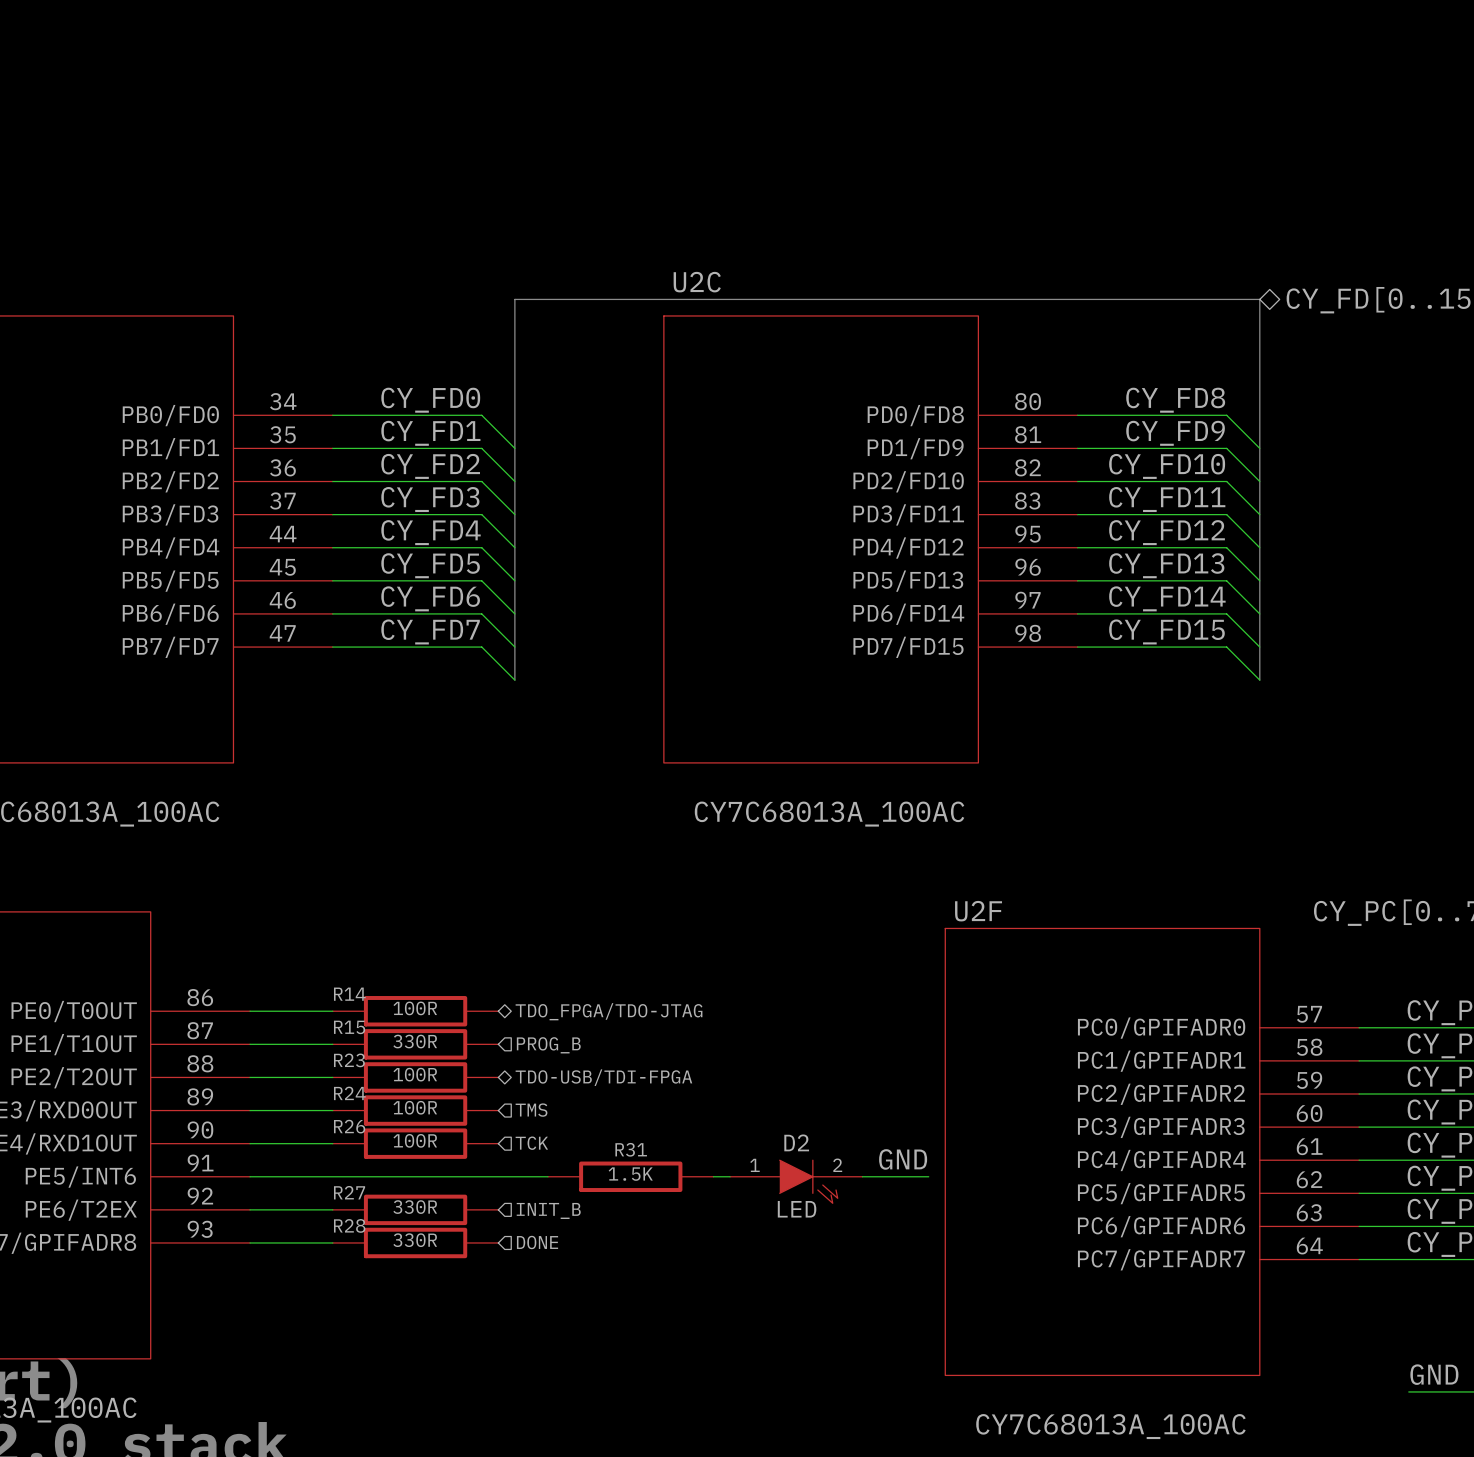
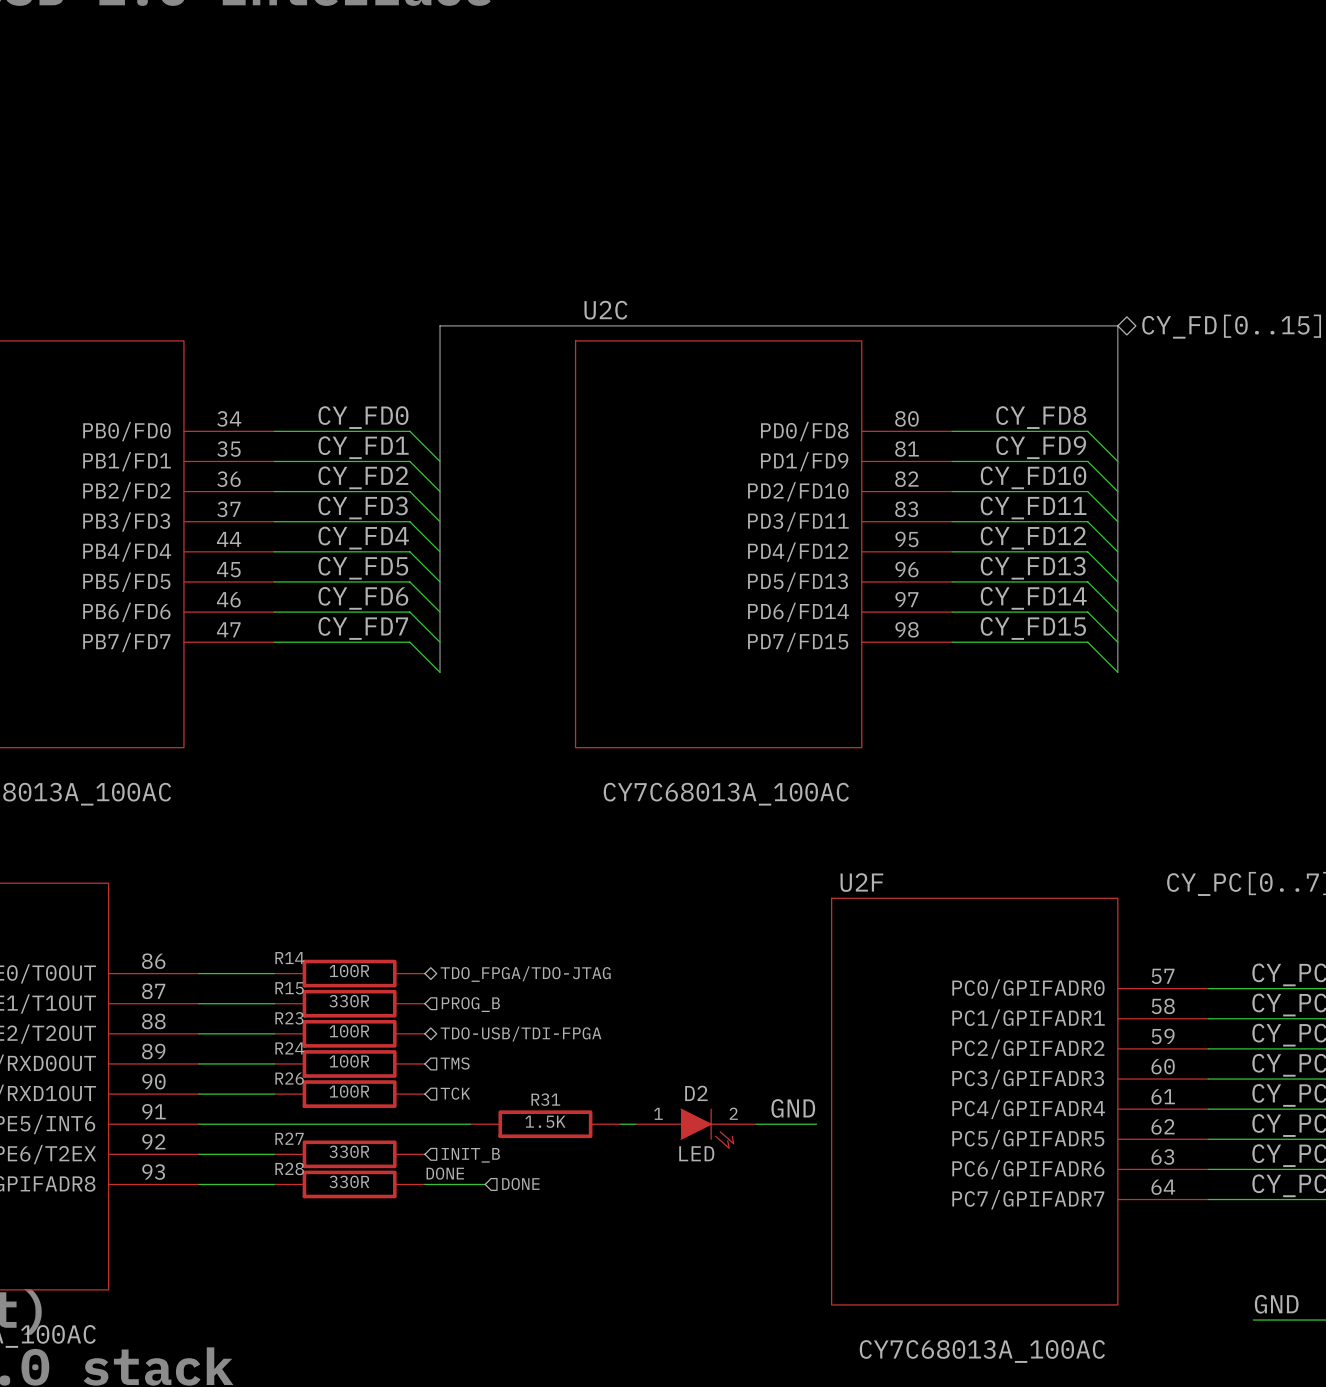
label: none -> DONE (445, 1173)
wire: none -> (424, 1184) (485, 1184)
hierarchical label position: DONE (537, 1242) -> DONE (520, 1184)

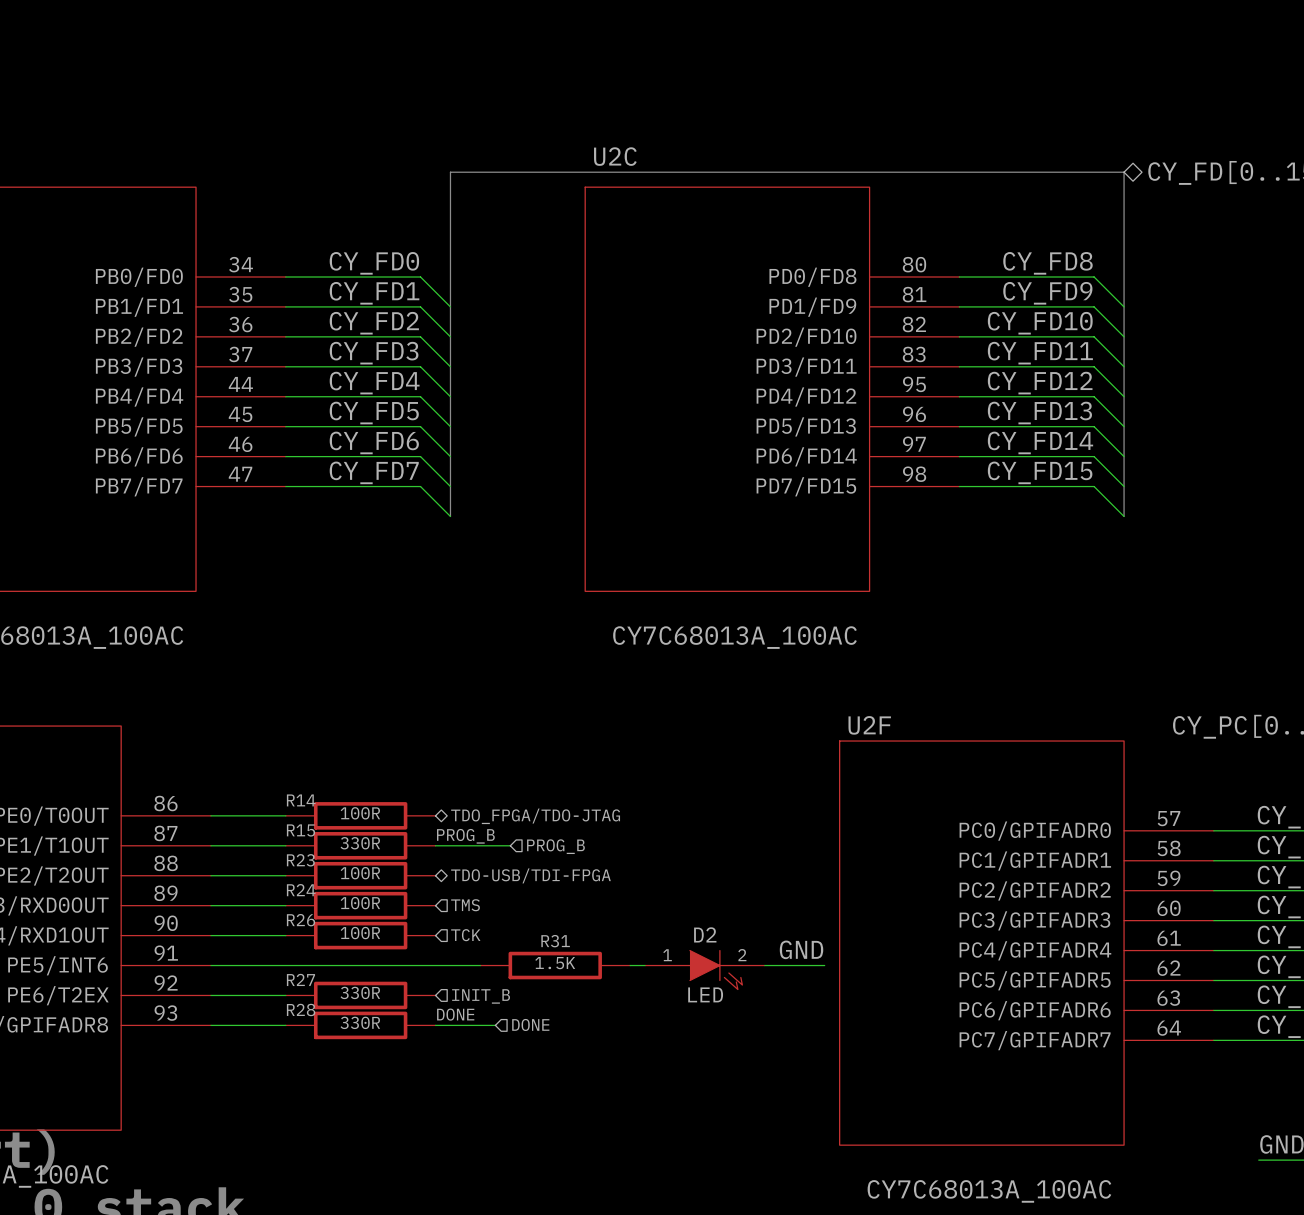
label: none -> PROG_B (465, 836)
wire: none -> (435, 845) (510, 845)
hierarchical label position: PROG_B (470, 1004) -> PROG_B (555, 846)

